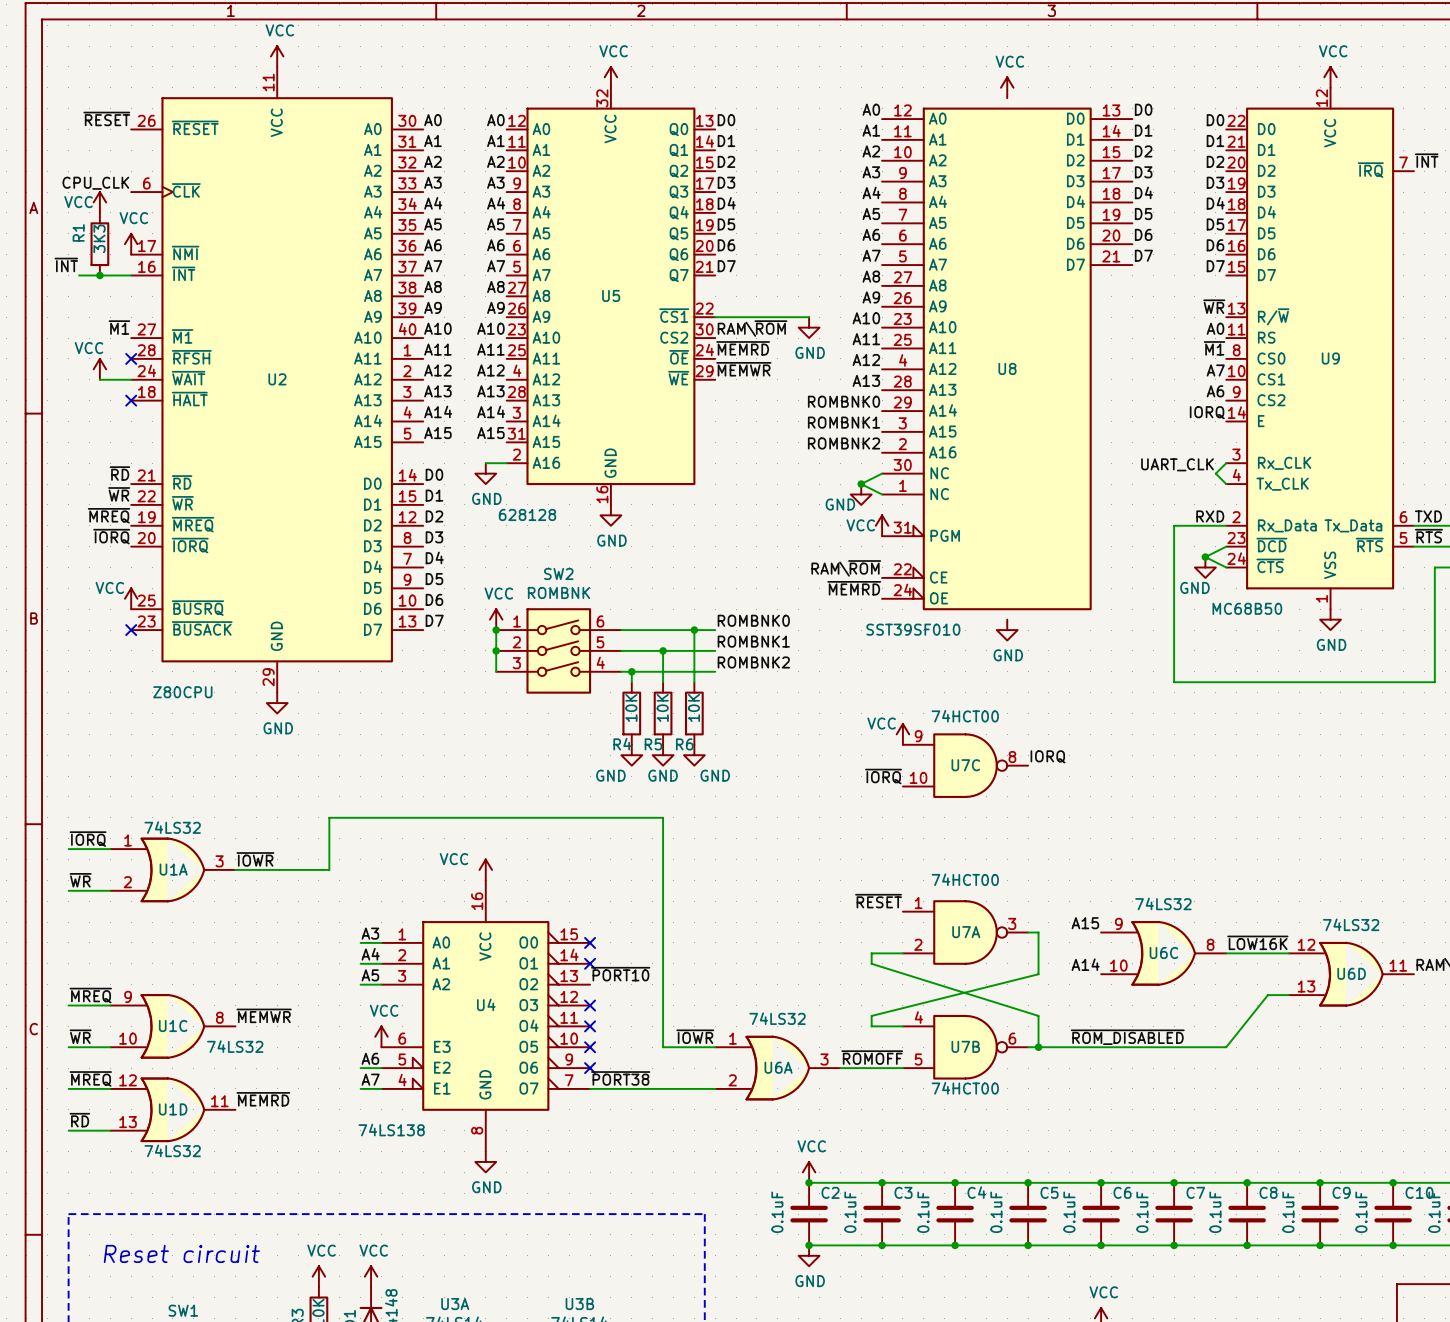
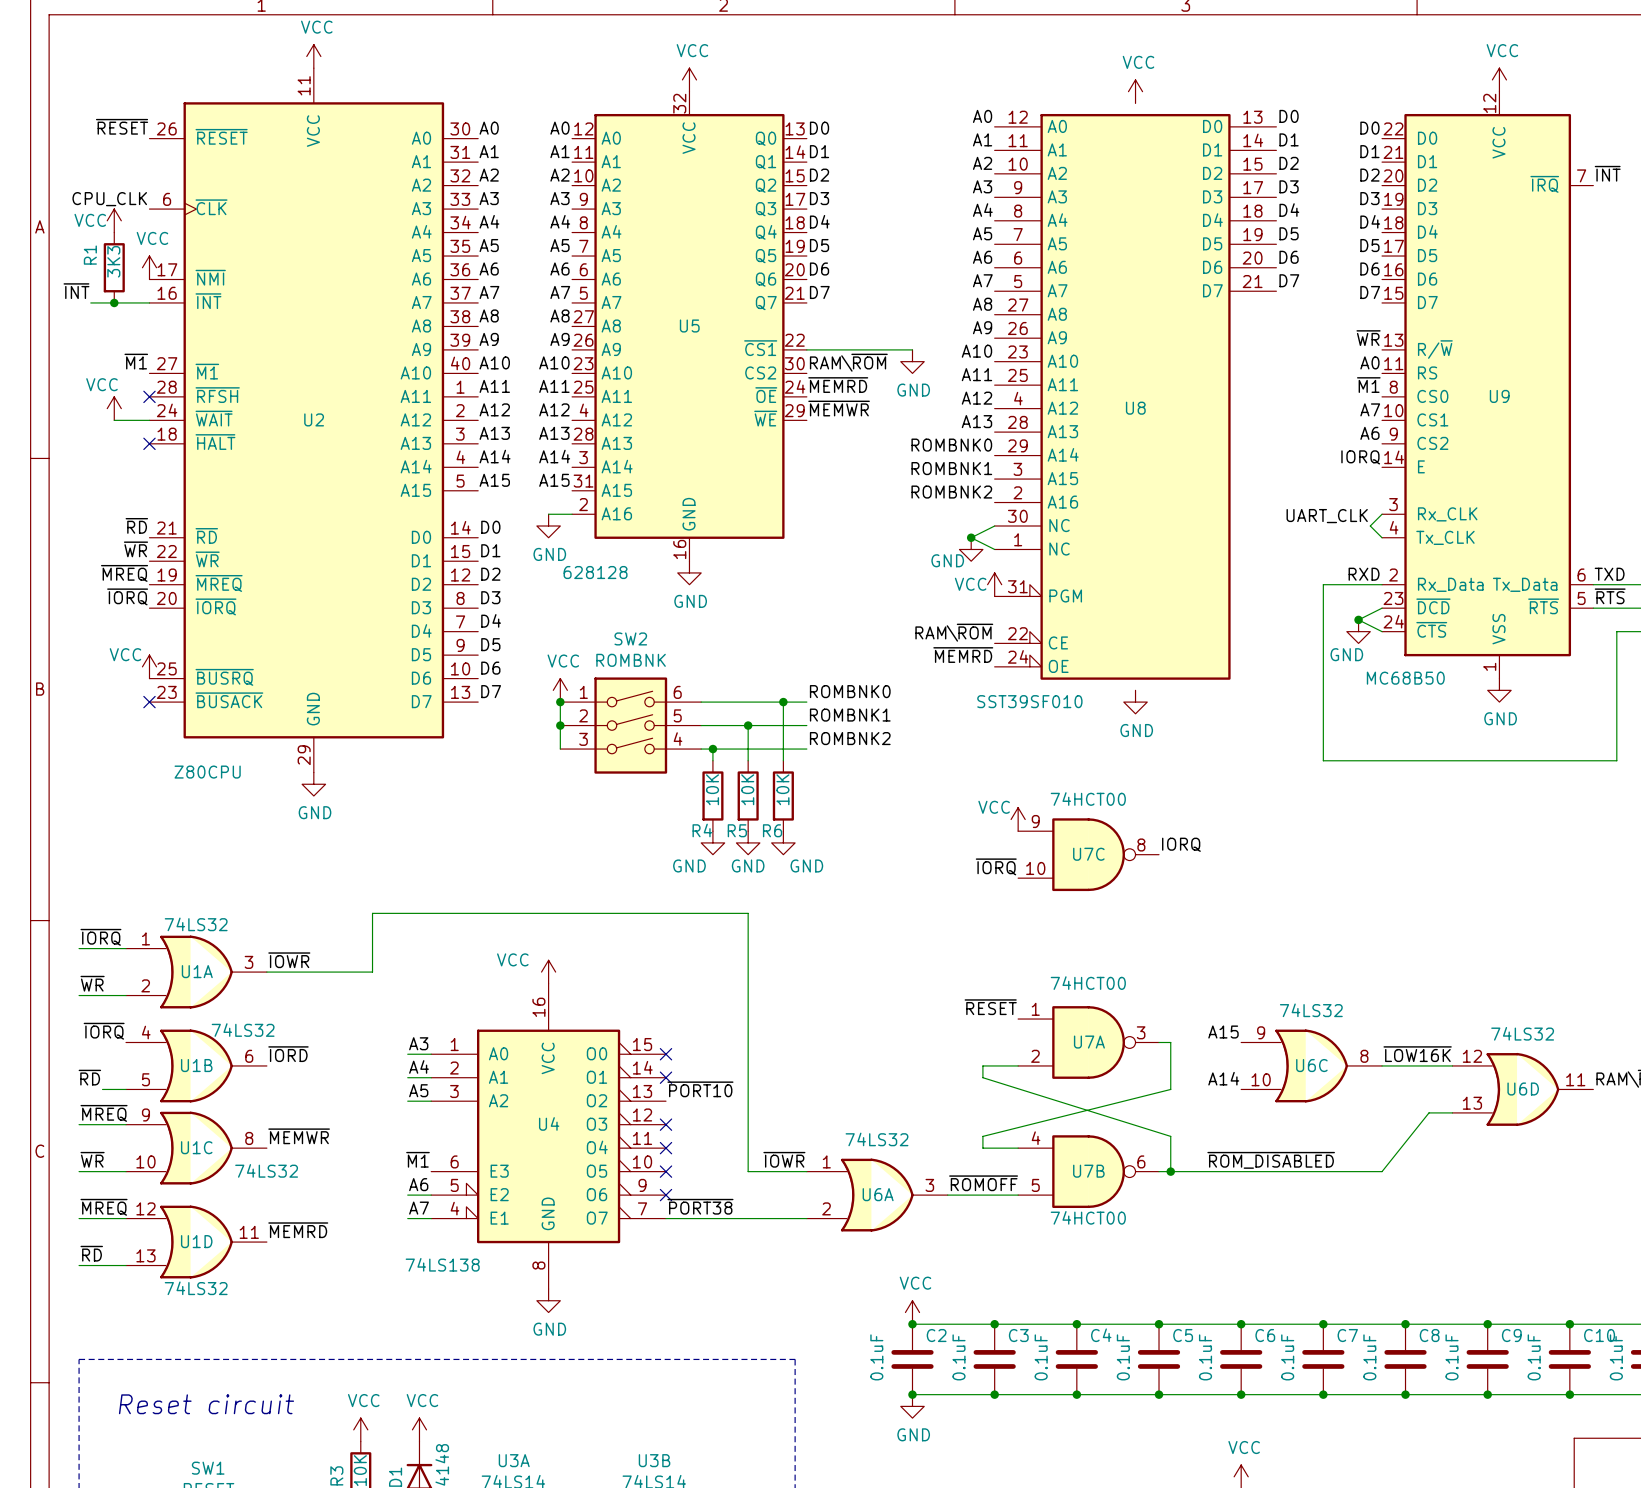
label: none -> ~{IORQ} (104, 1031)
label: none -> ~{IORD} (288, 1054)
U1B: none -> 74LS32 (196, 1065)
label: none -> ~{RD} (89, 1077)
wire: none -> (102, 1089) (126, 1089)
label: none -> ~{M1} (417, 1159)
power symbol: VCC (381, 1036) -> none

